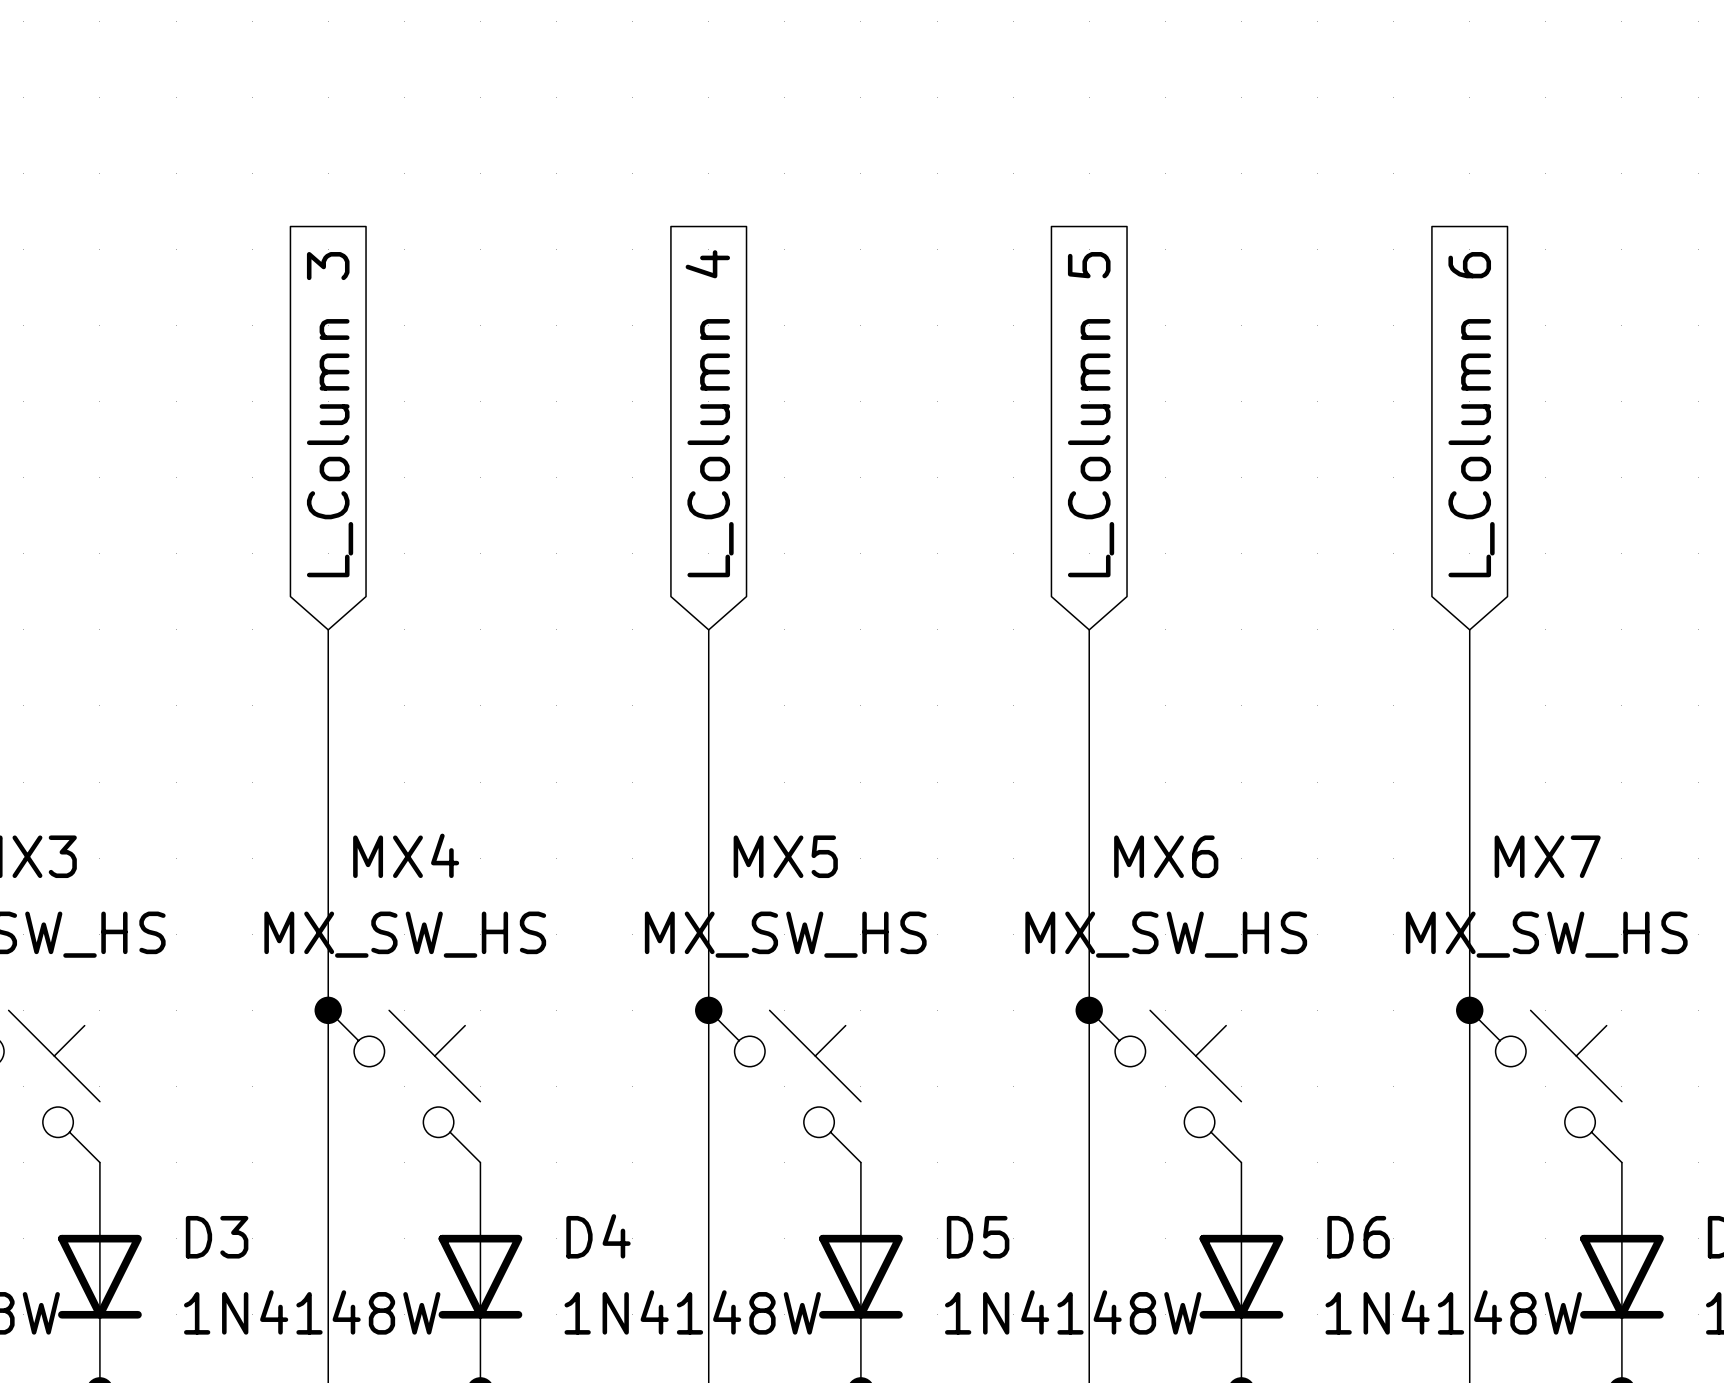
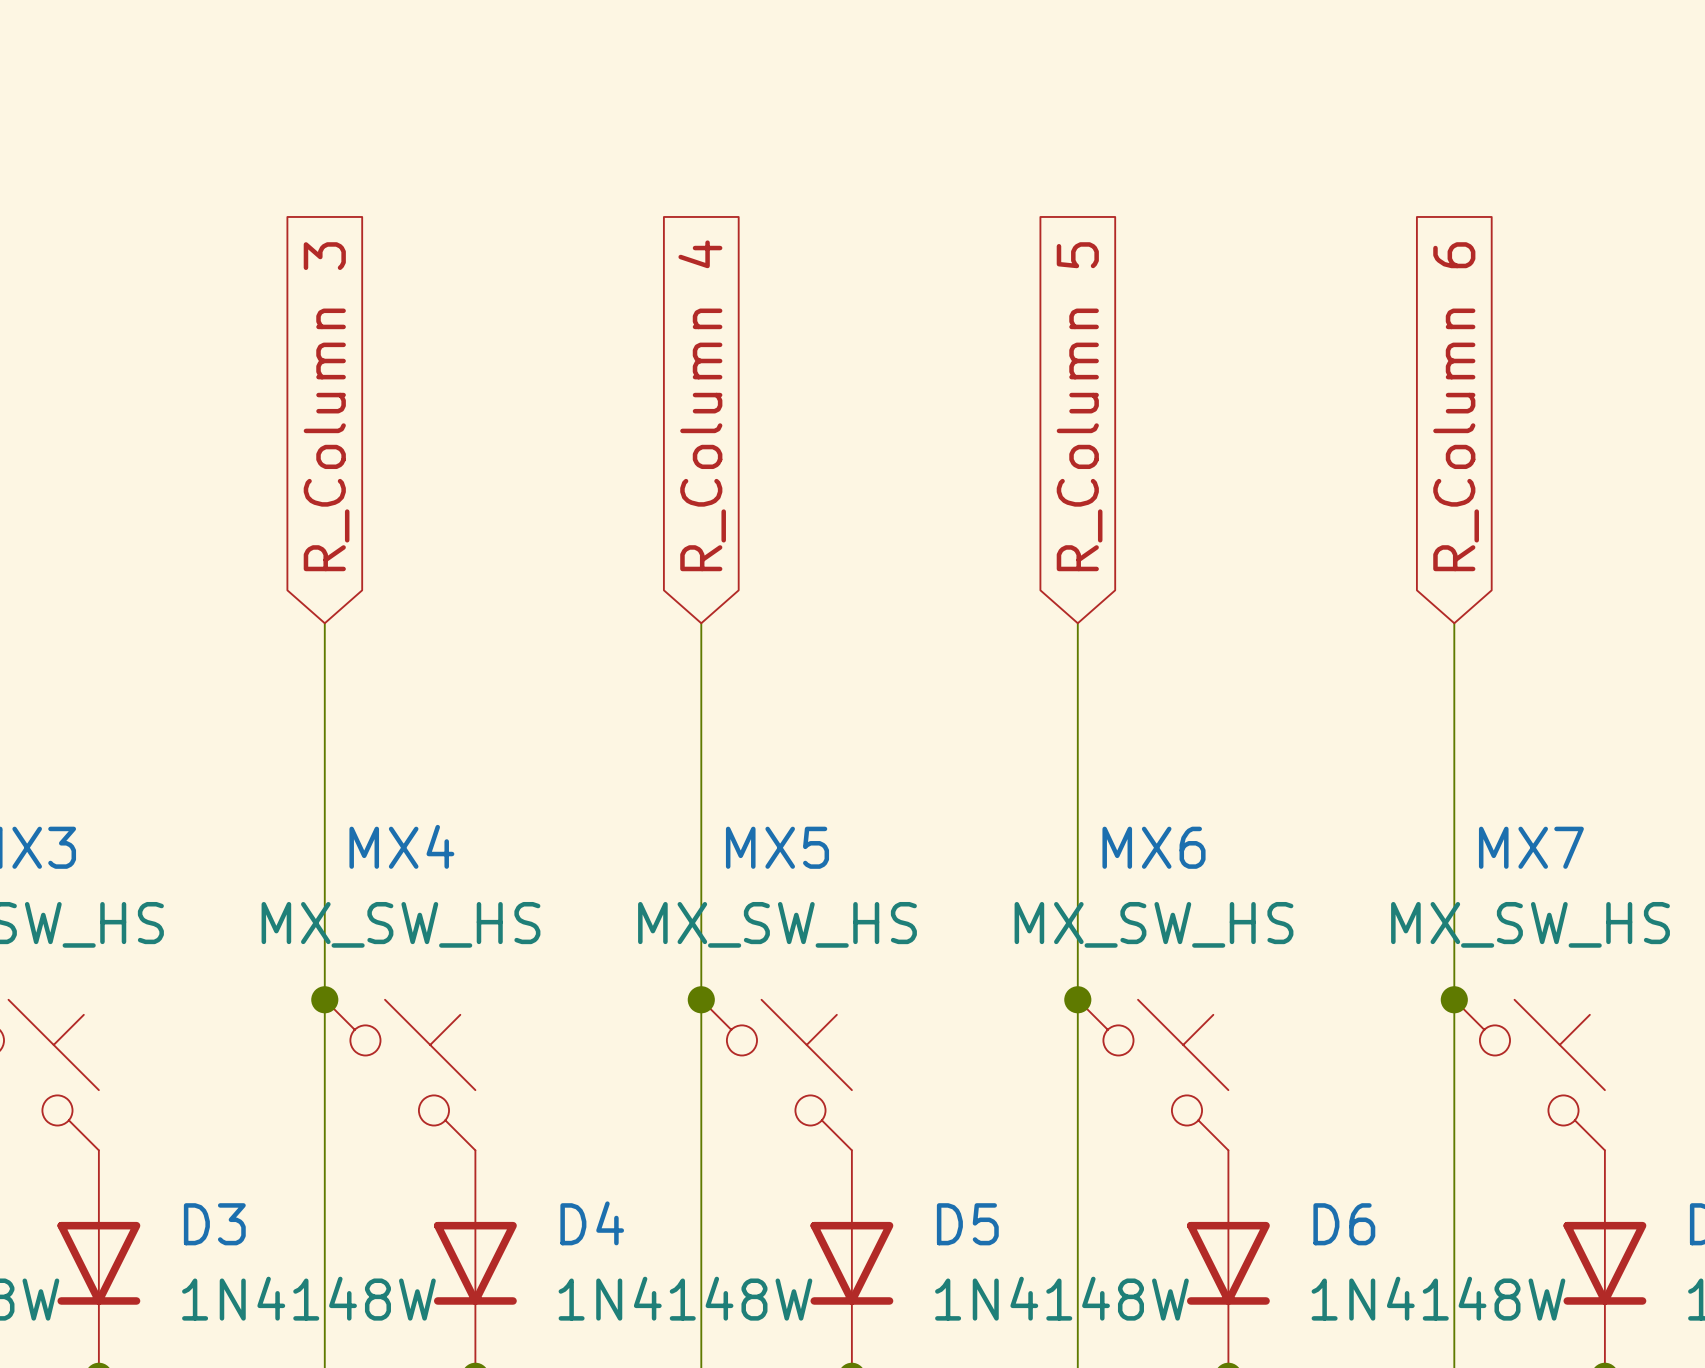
global label: L_Column 4 (709, 413) -> R_Column 4 (702, 405)
global label: L_Column 3 (330, 414) -> R_Column 3 (326, 406)
global label: L_Column 5 (1091, 414) -> R_Column 5 (1079, 406)
global label: L_Column 6 (1471, 414) -> R_Column 6 (1456, 406)

